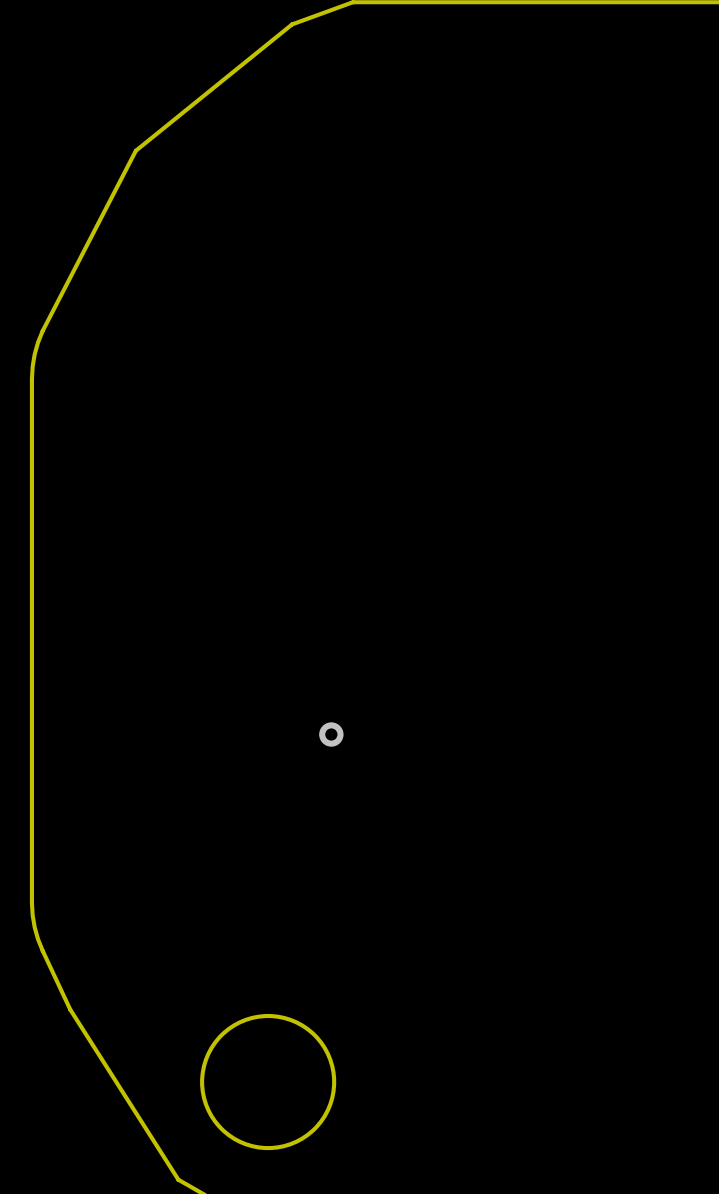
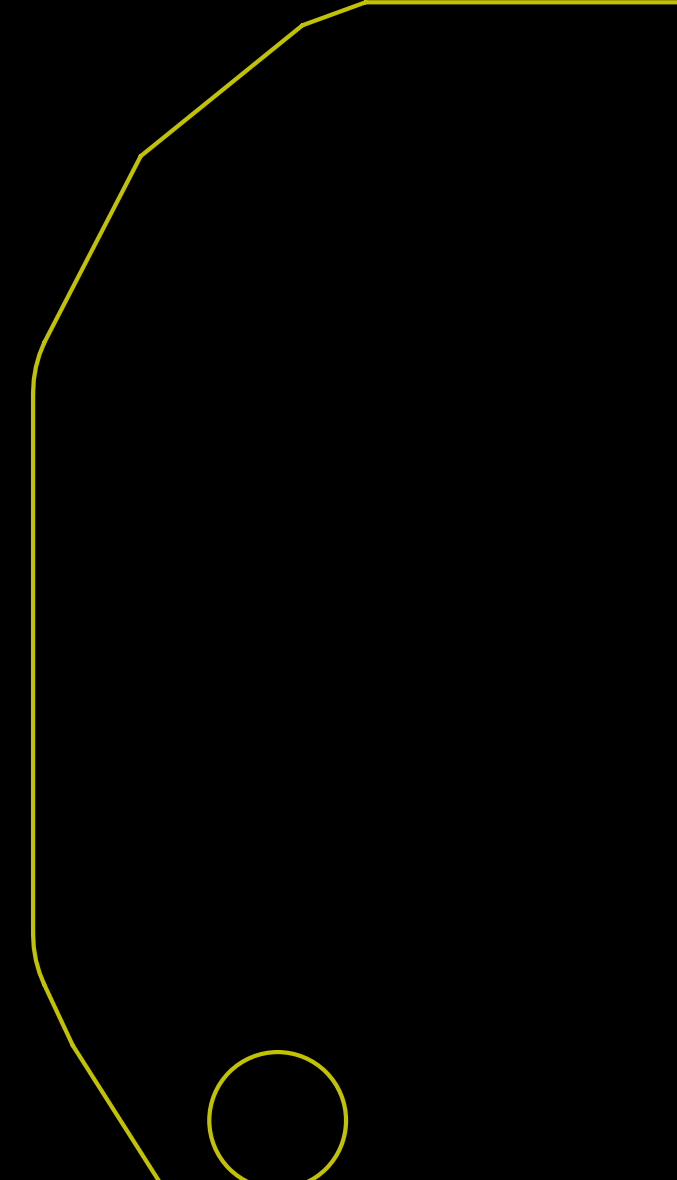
via: (331, 734) -> none

